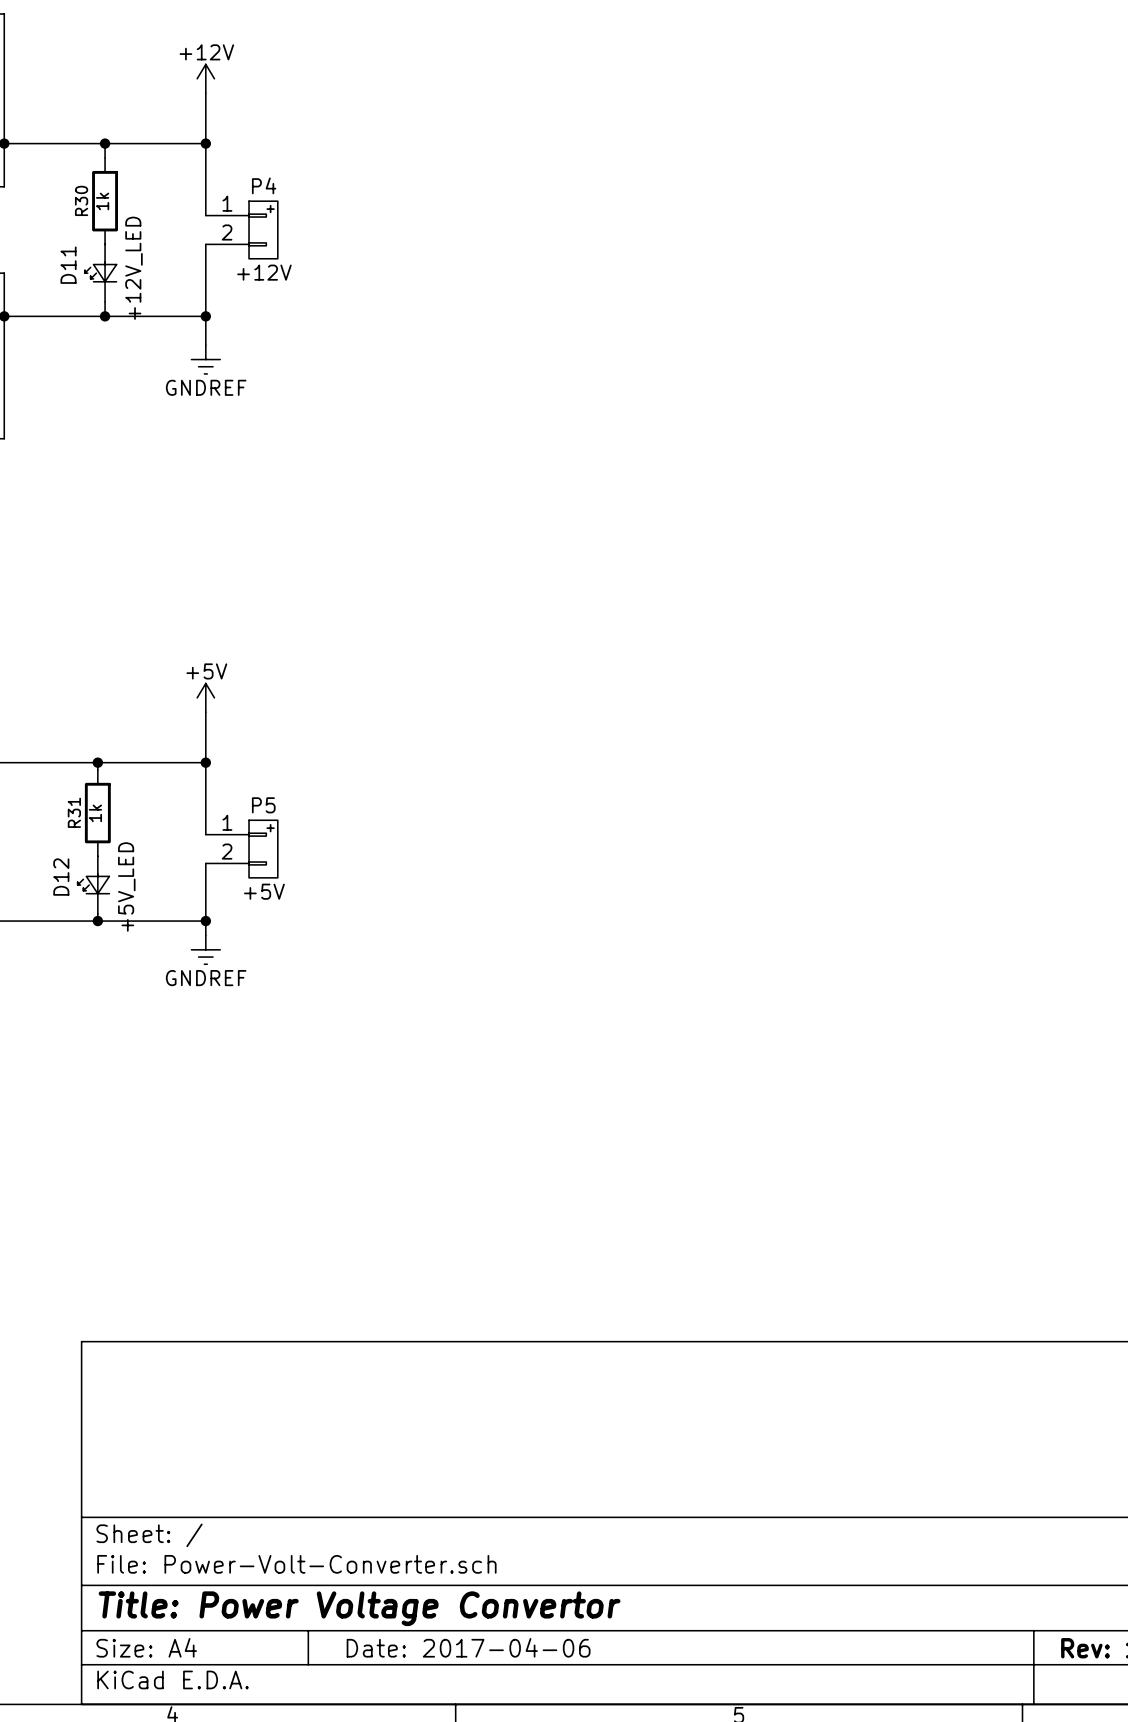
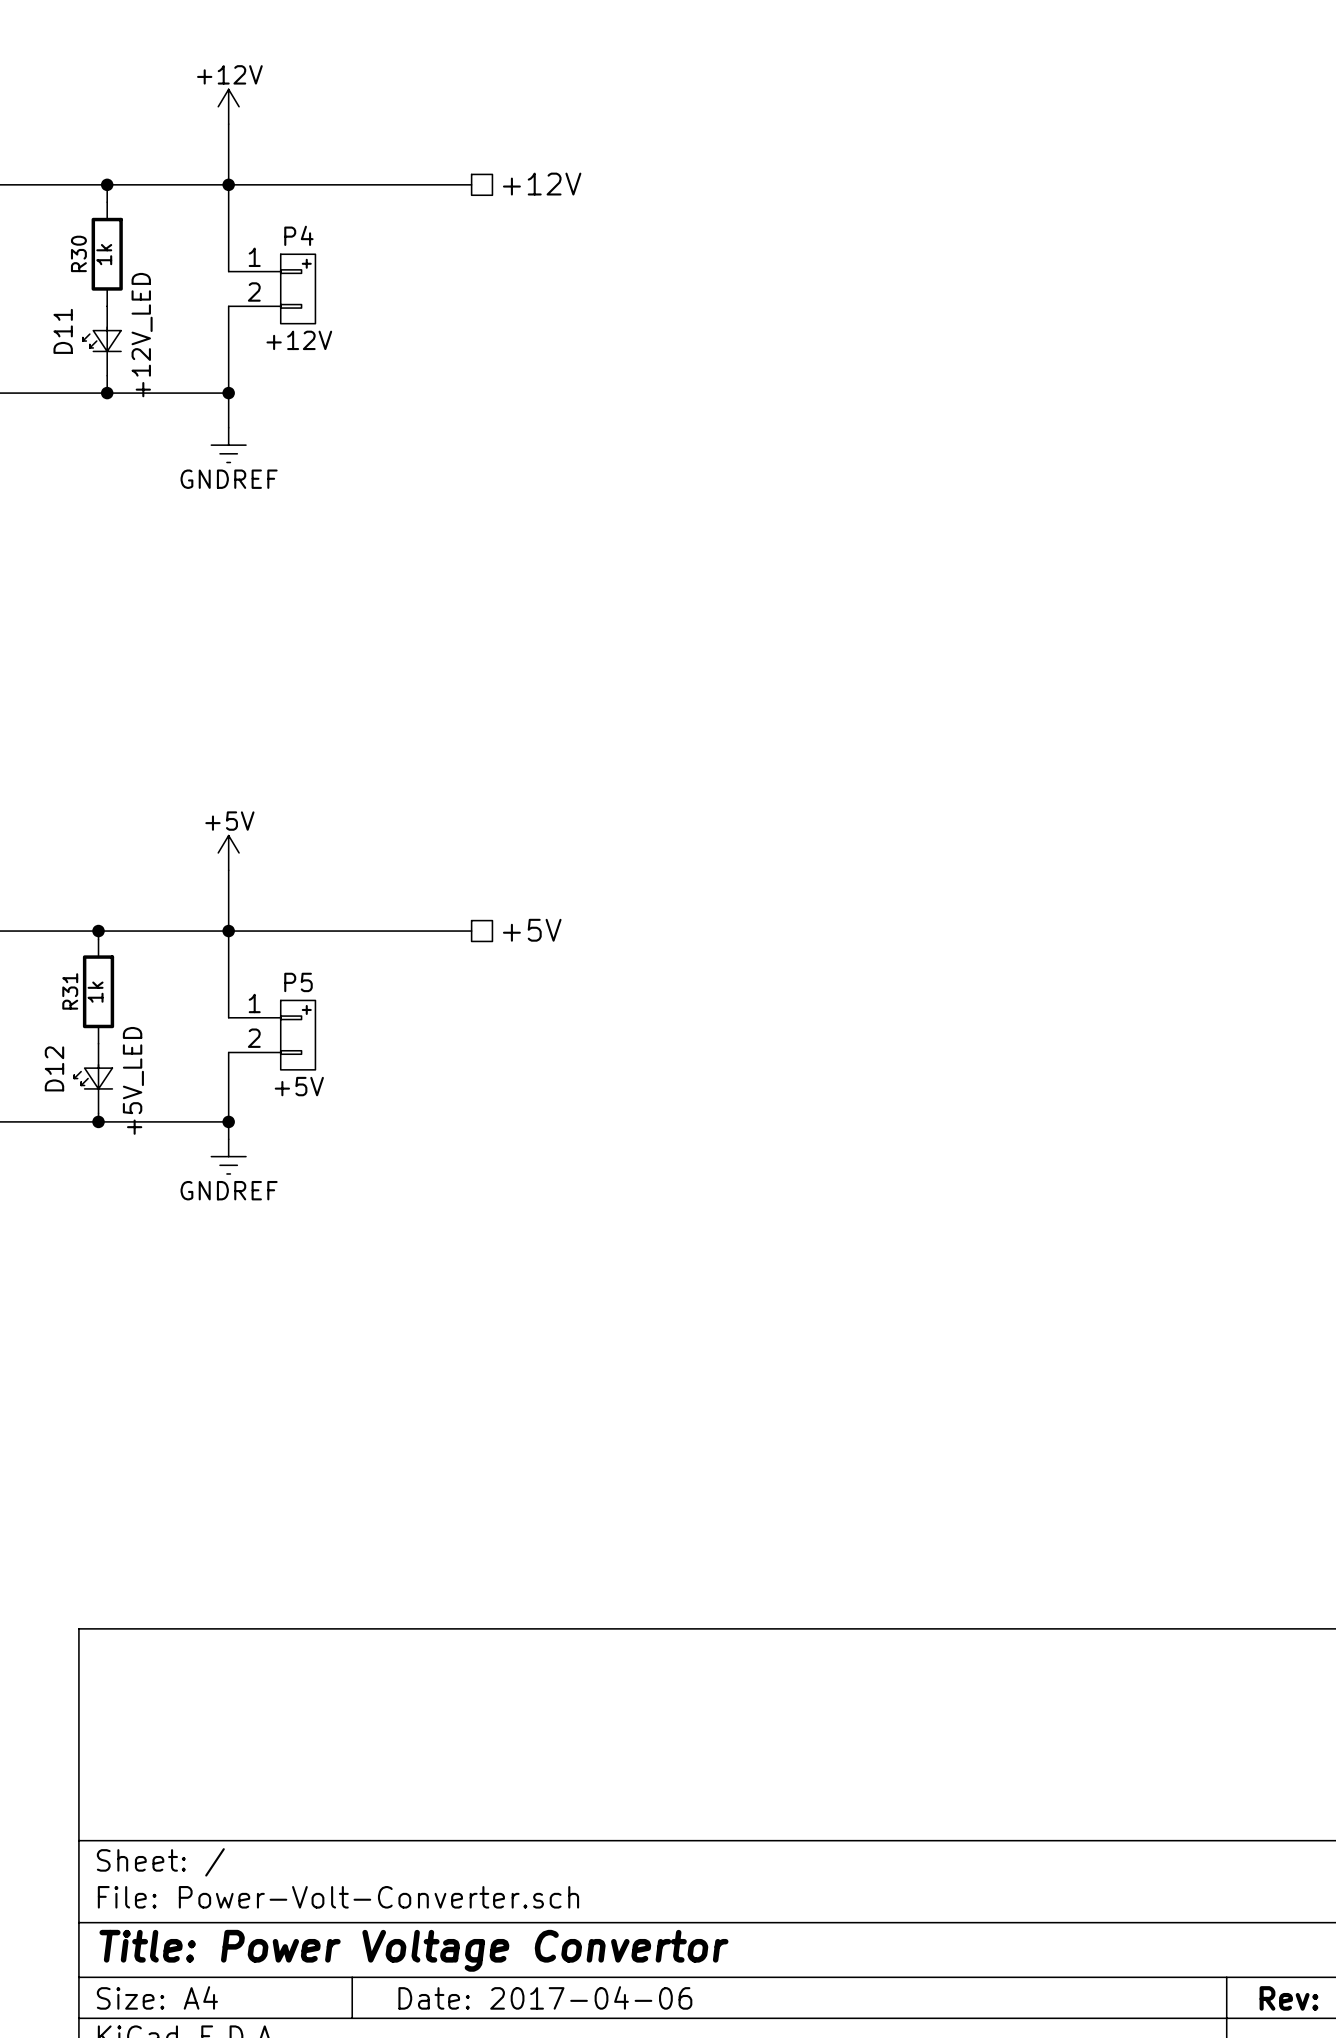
hierarchical label: none -> +12V (542, 184)
wire: none -> (228, 184) (471, 184)
wire: none -> (228, 931) (471, 931)
hierarchical label: none -> +5V (532, 930)

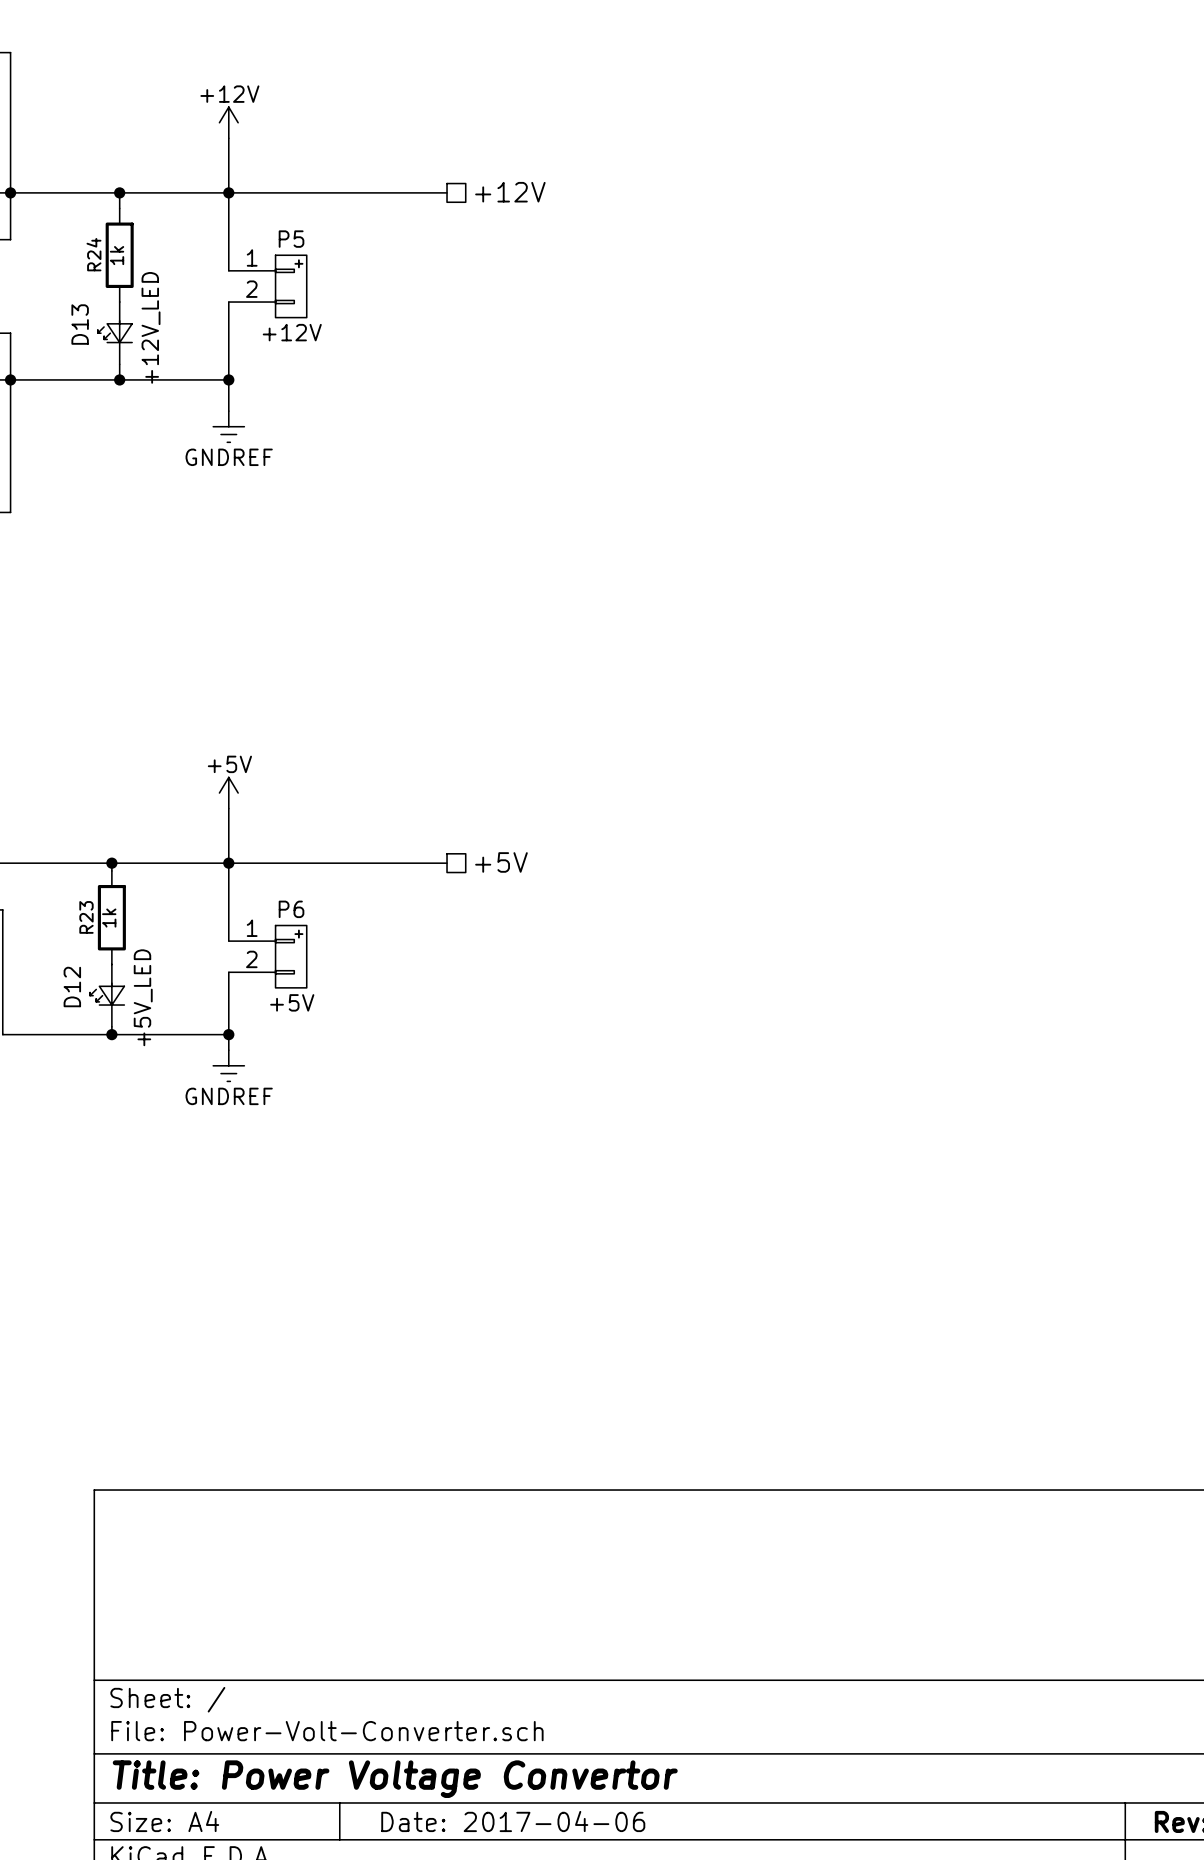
P4 name: P4 (298, 235) -> P5 (291, 239)
R30 name: R30 (78, 253) -> R24 (93, 254)
D11 name: D11 (63, 331) -> D13 (80, 324)
P5 name: P5 (298, 982) -> P6 (291, 909)
R31 name: R31 (70, 991) -> R23 (86, 917)

